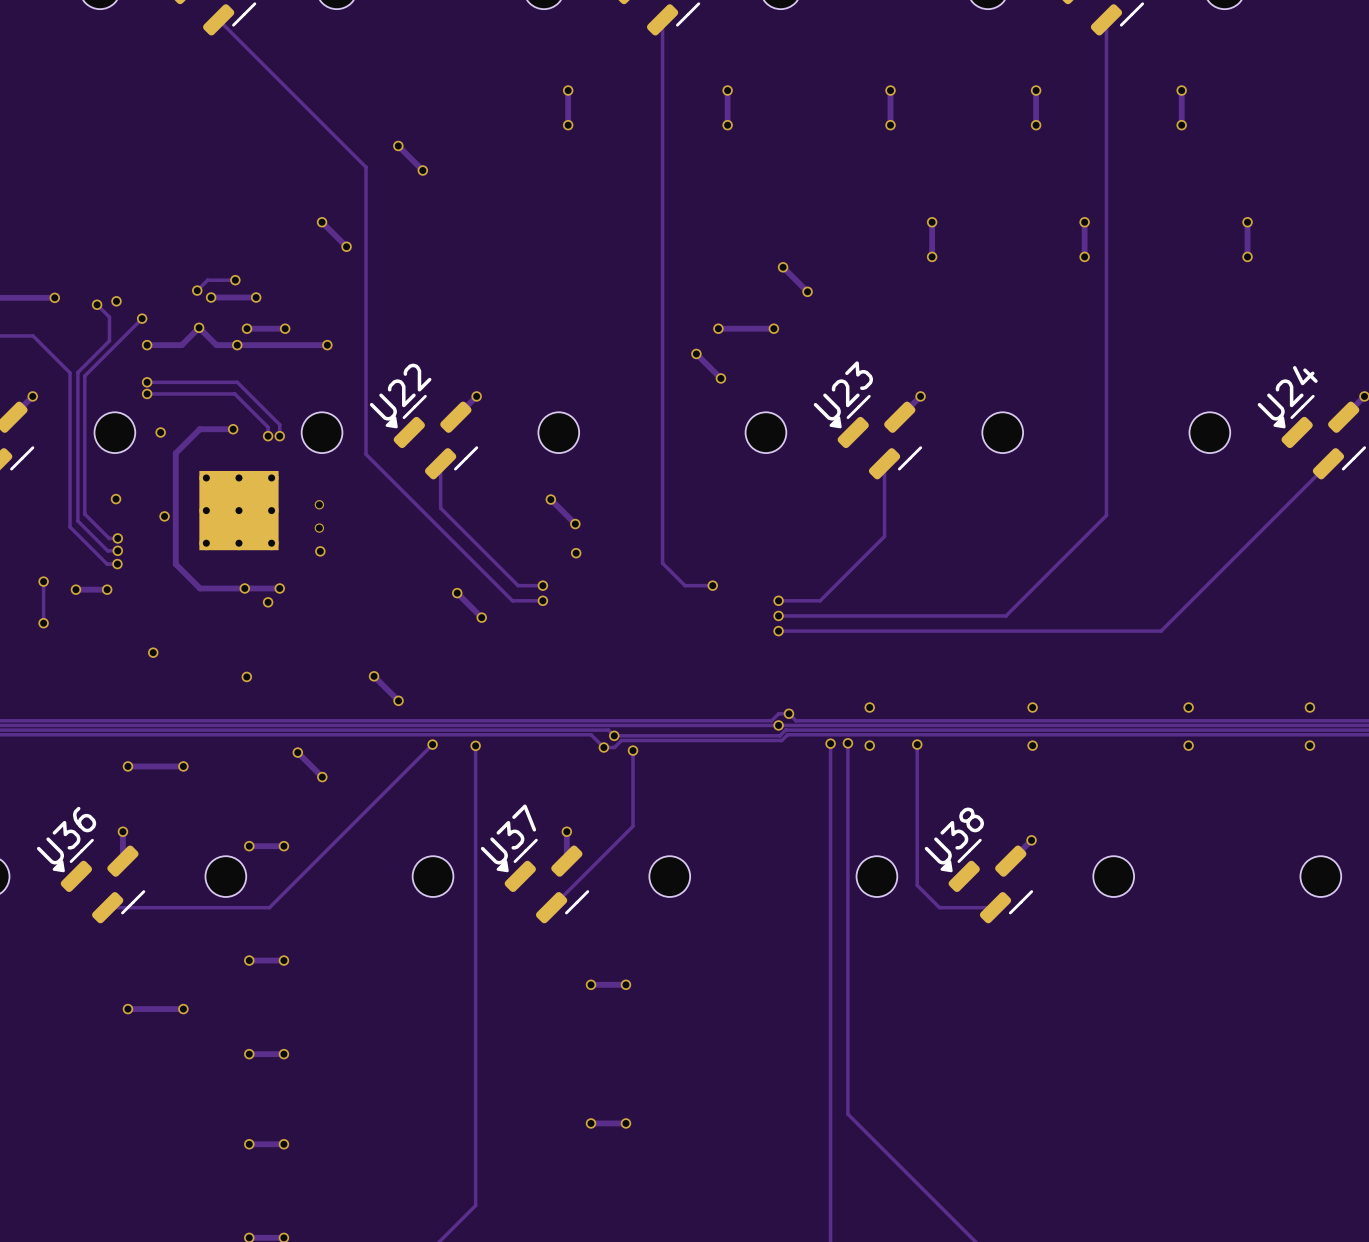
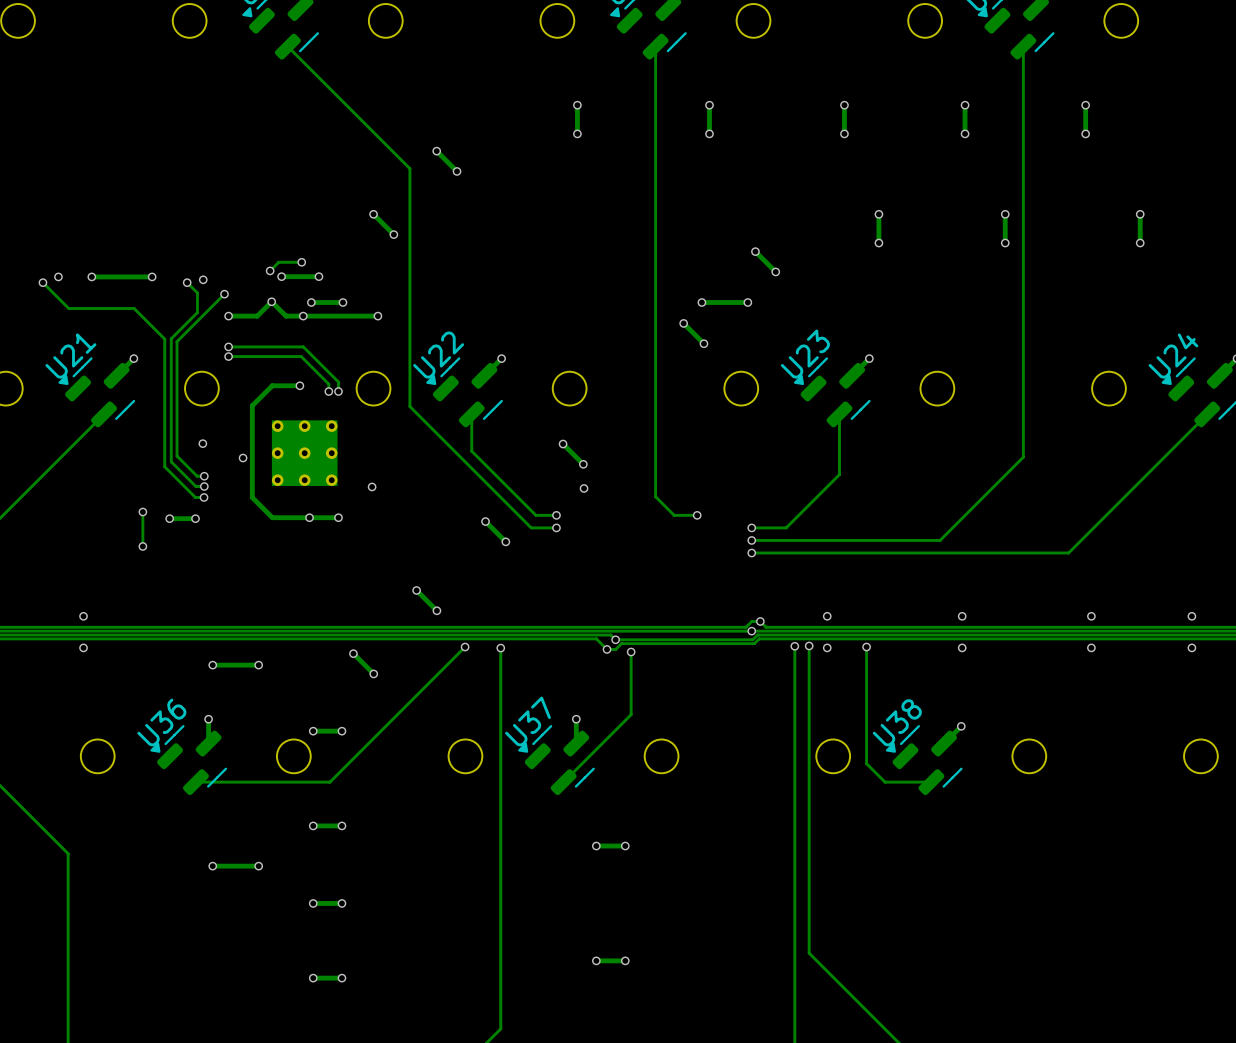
via: (160, 432) -> none
via: (319, 504) -> none
via: (319, 528) -> none
via: (268, 602) -> none
via: (153, 652) -> none
via: (246, 676) -> none

